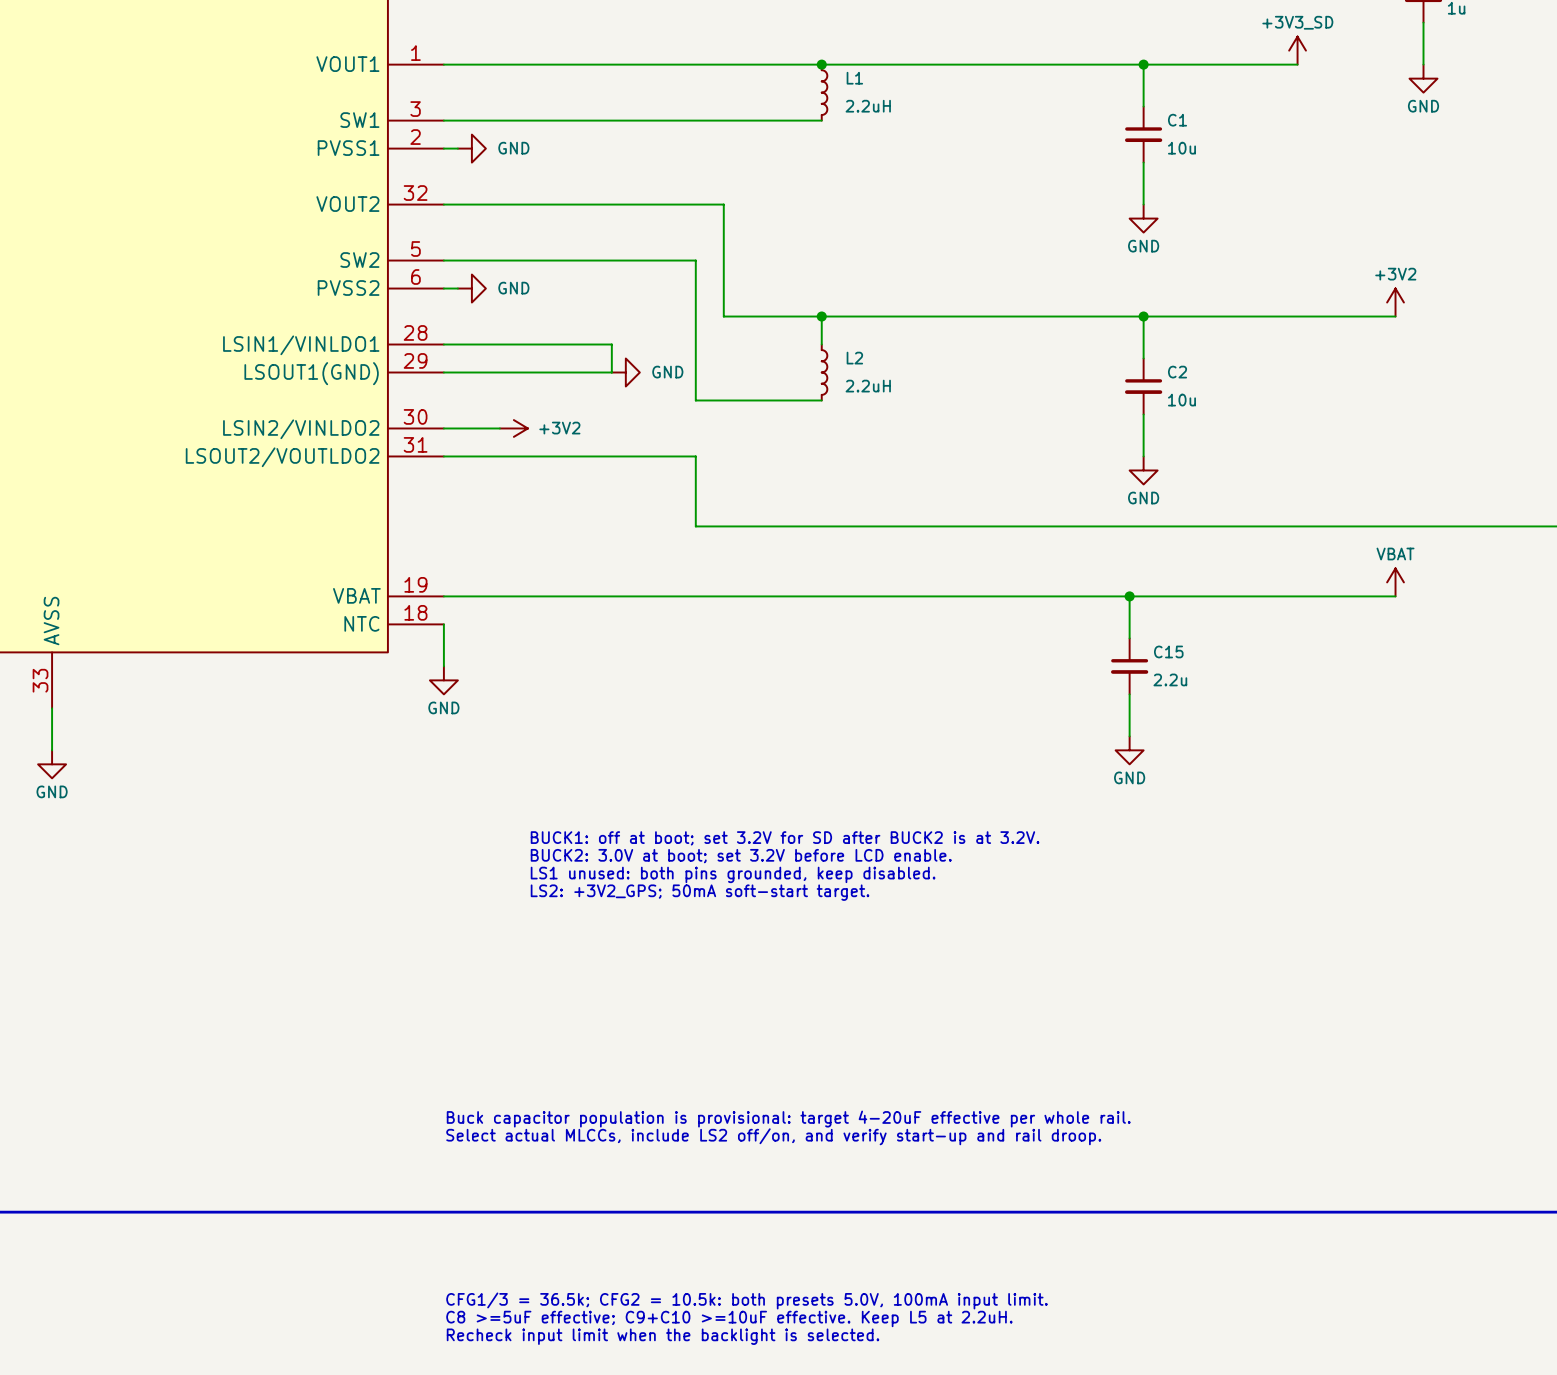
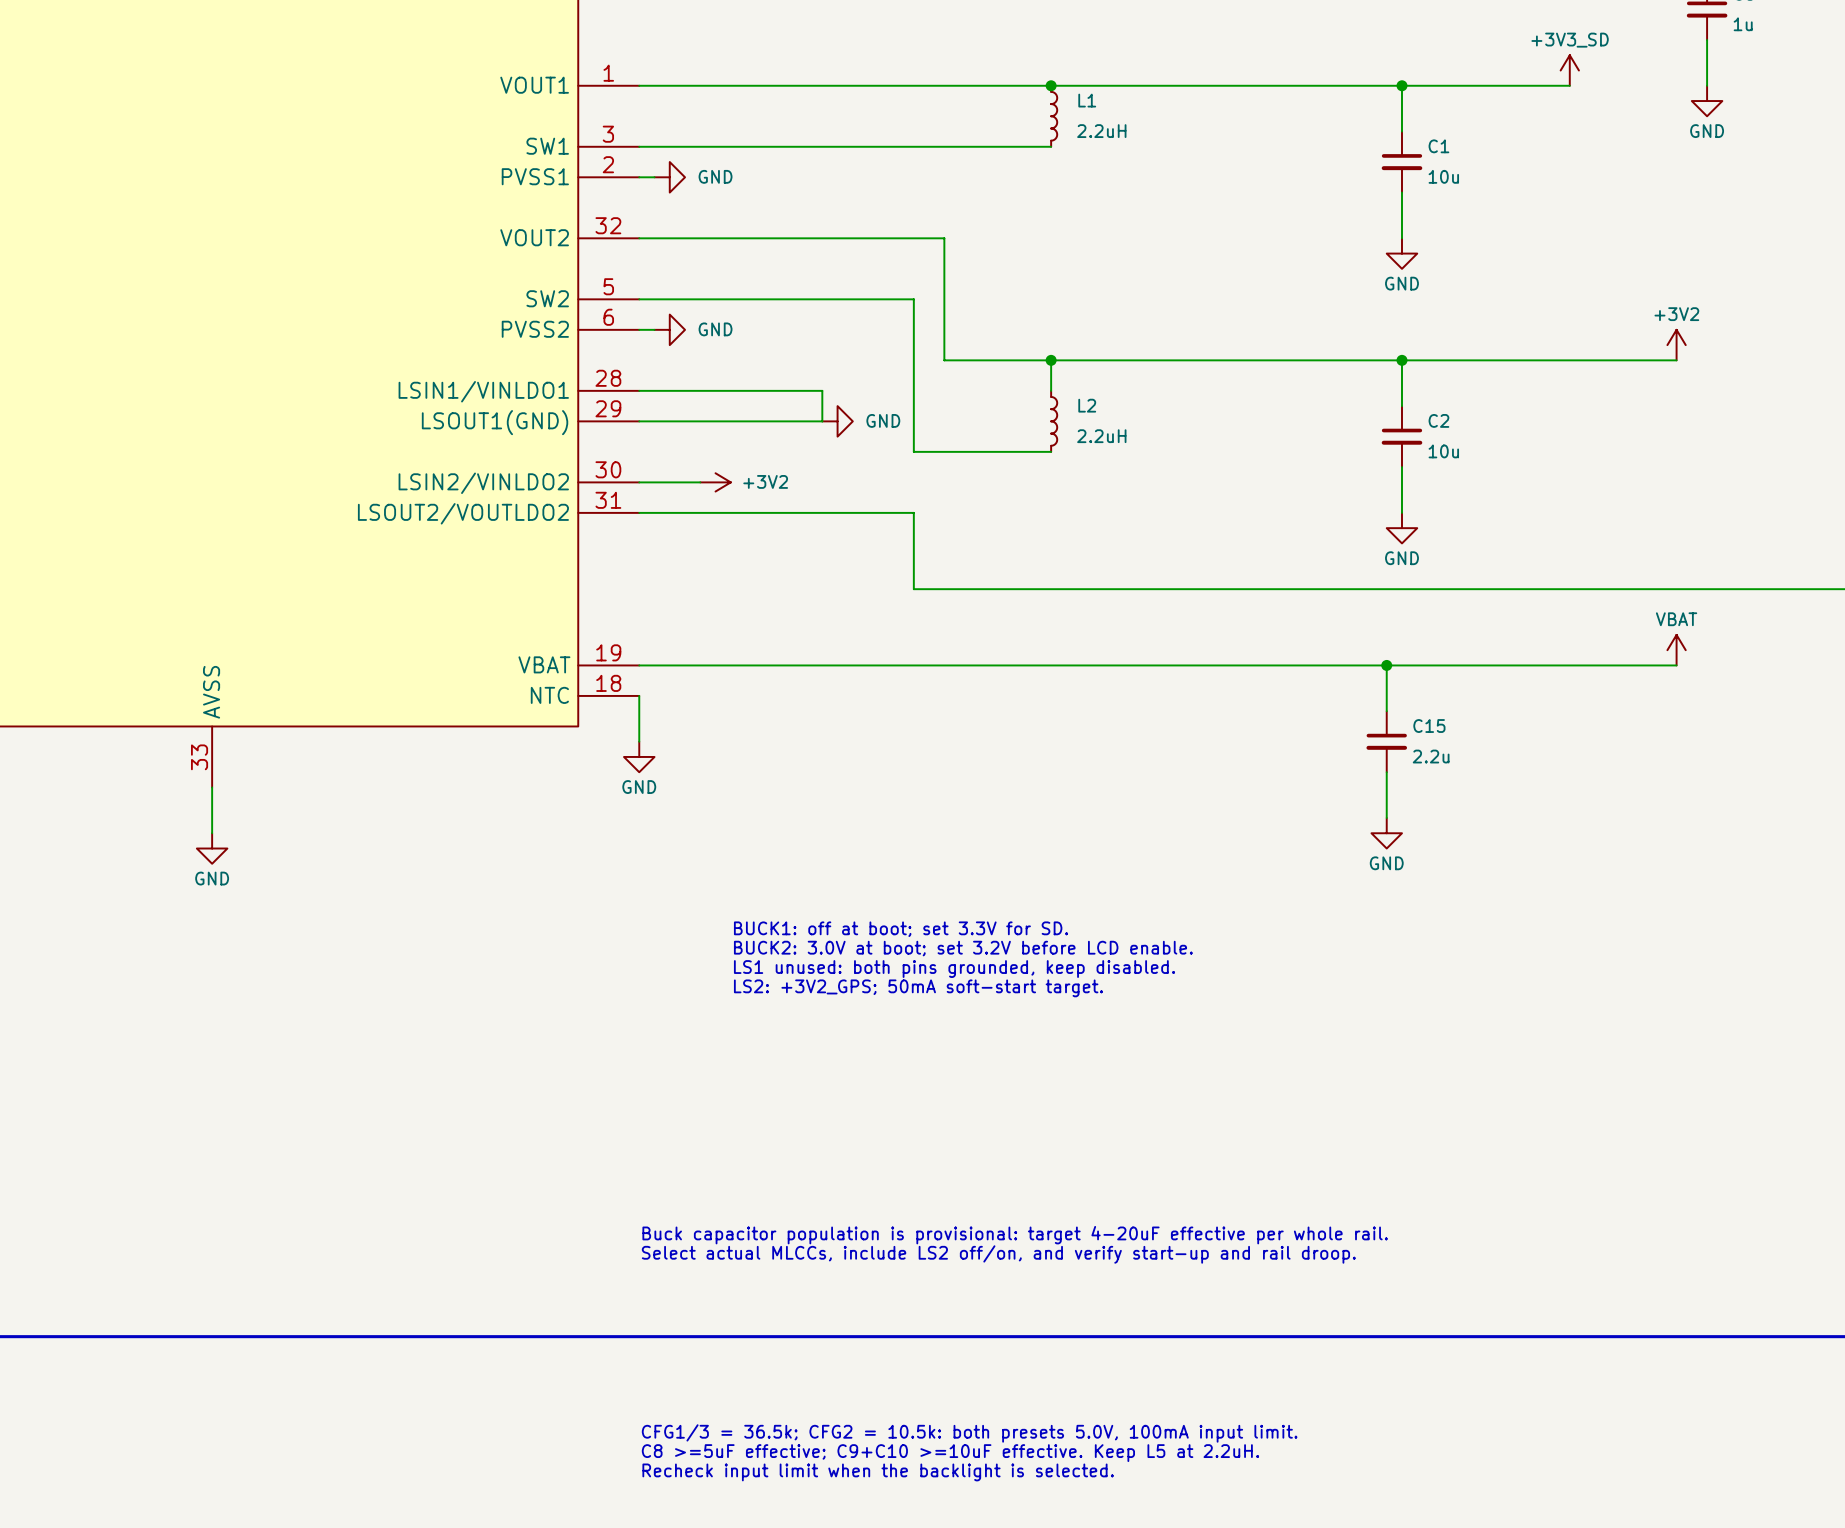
text: BUCK1: off at boot; set 3.2V for SD after BUCK2 is at 3.2V. (785, 838) -> BUCK1: off at boot; set 3.3V for SD. (901, 929)

